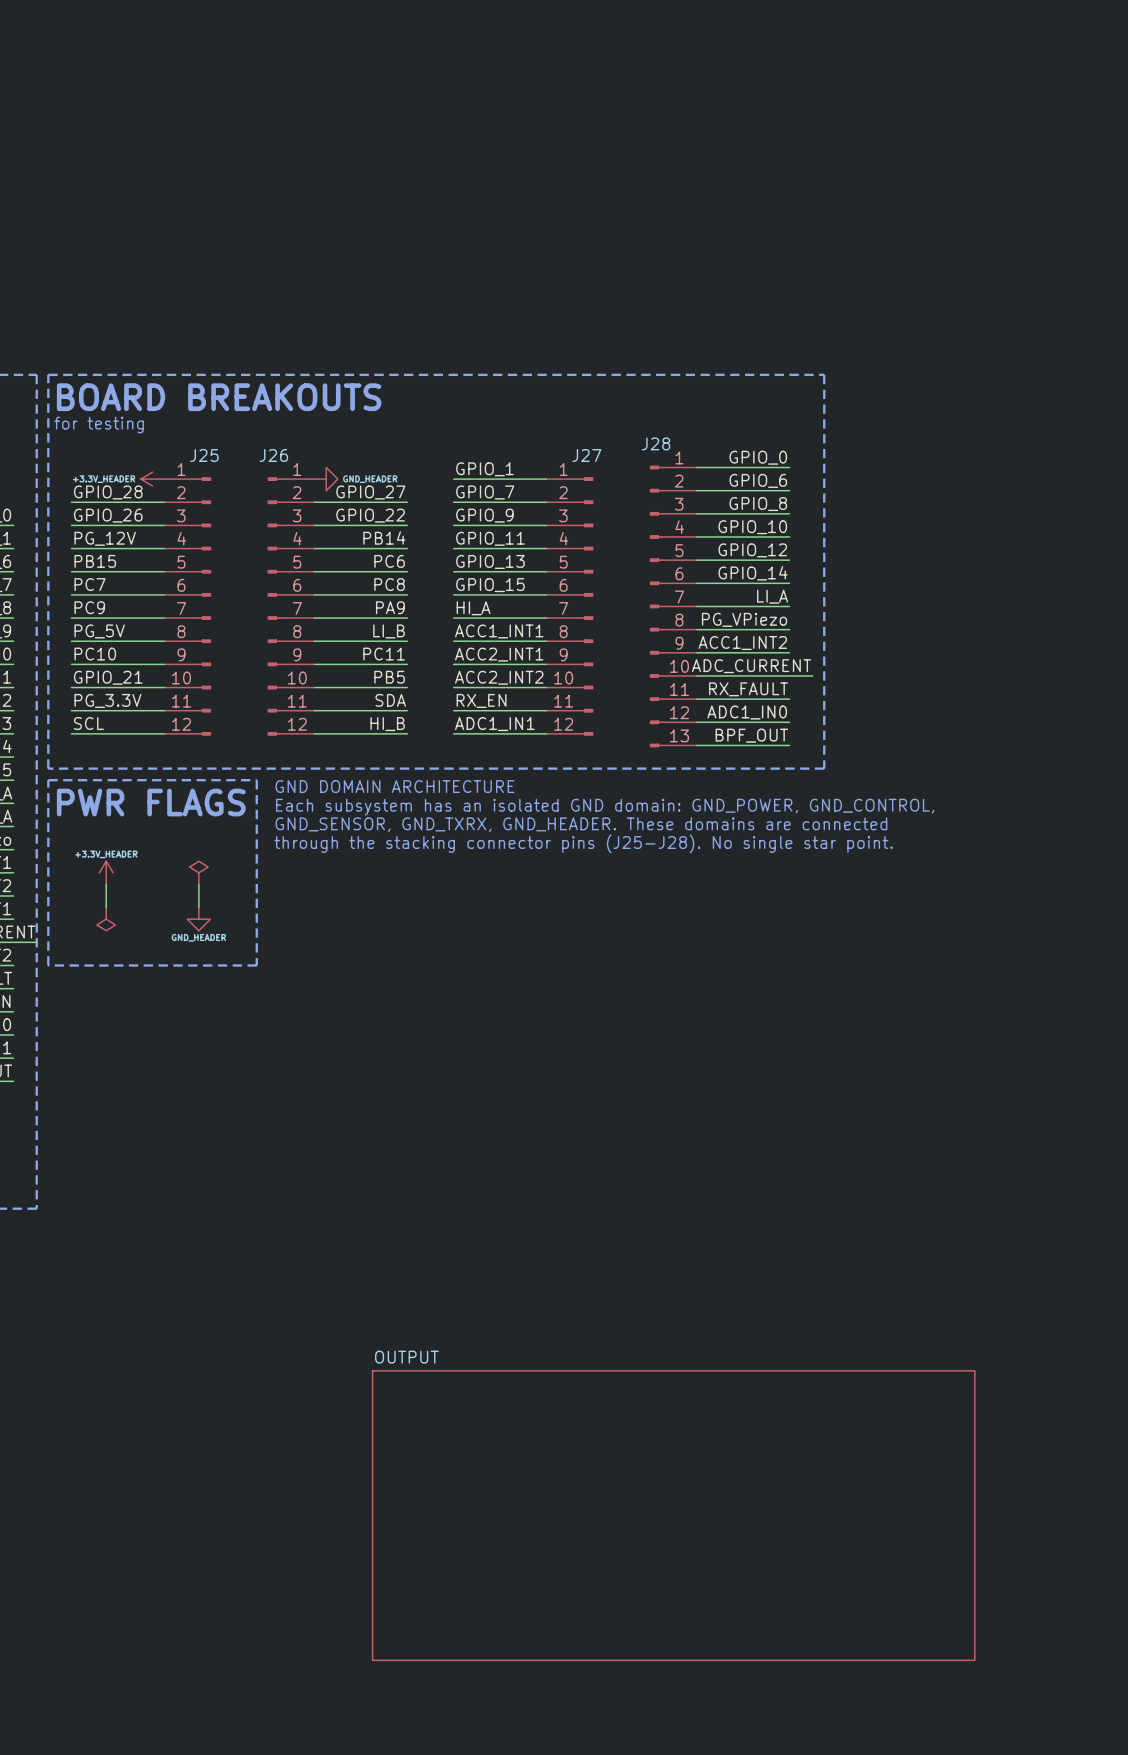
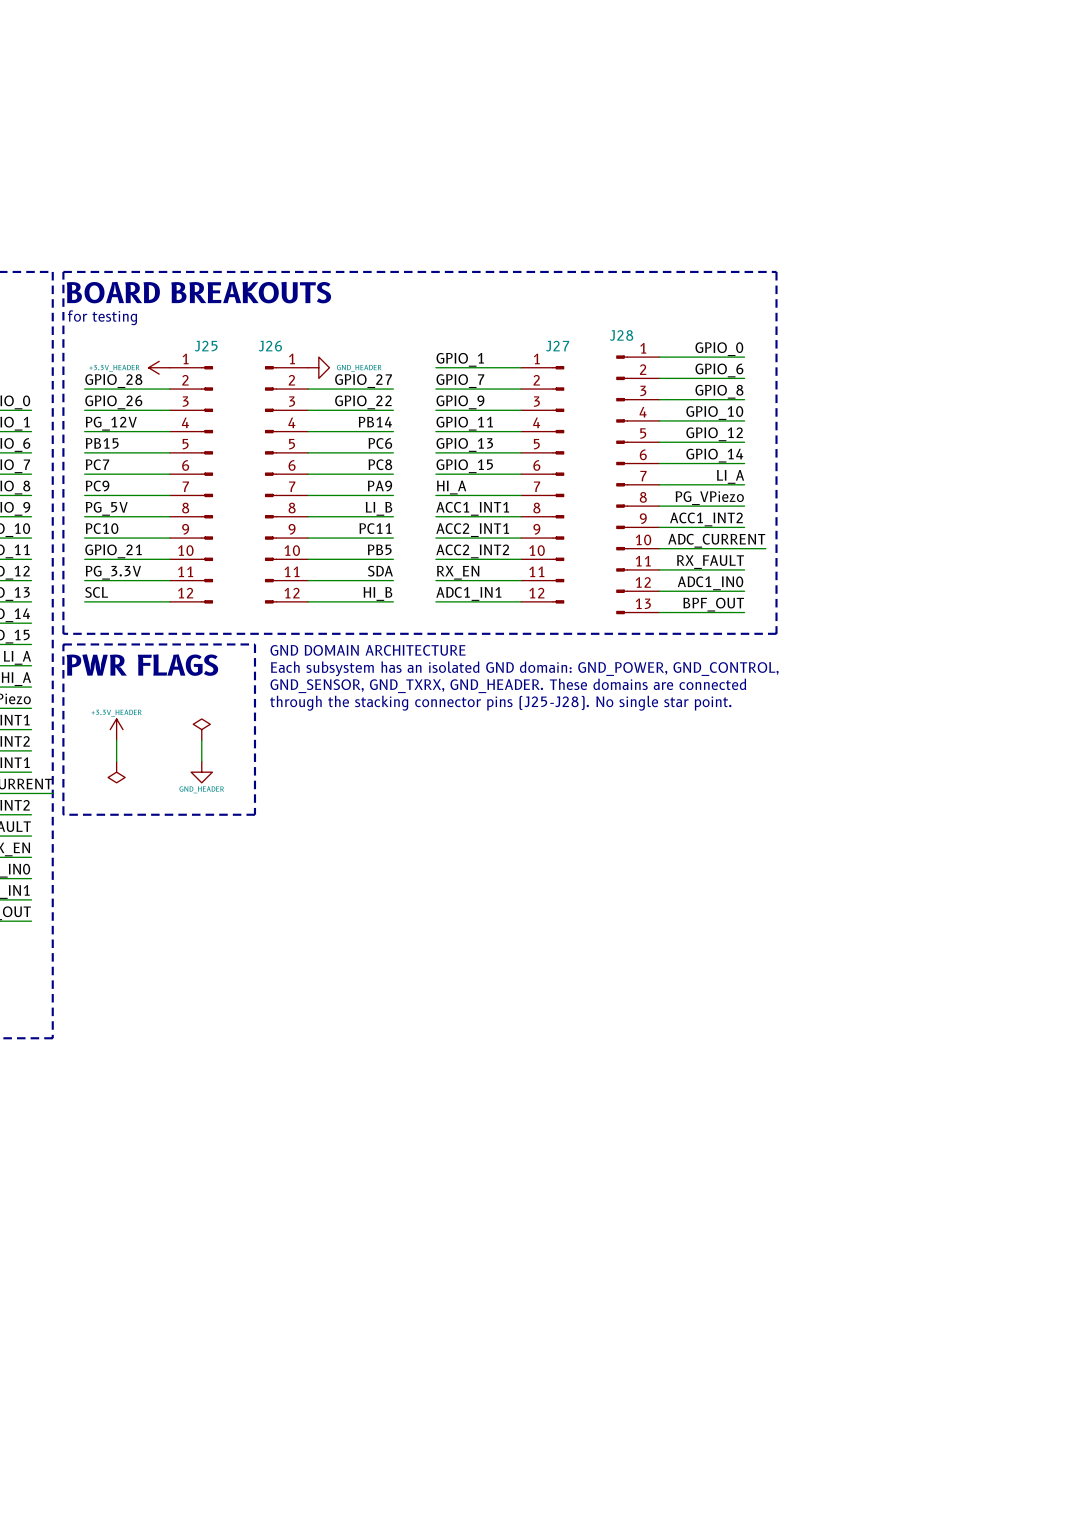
sheet OUTPUT: (673, 1515) -> none

